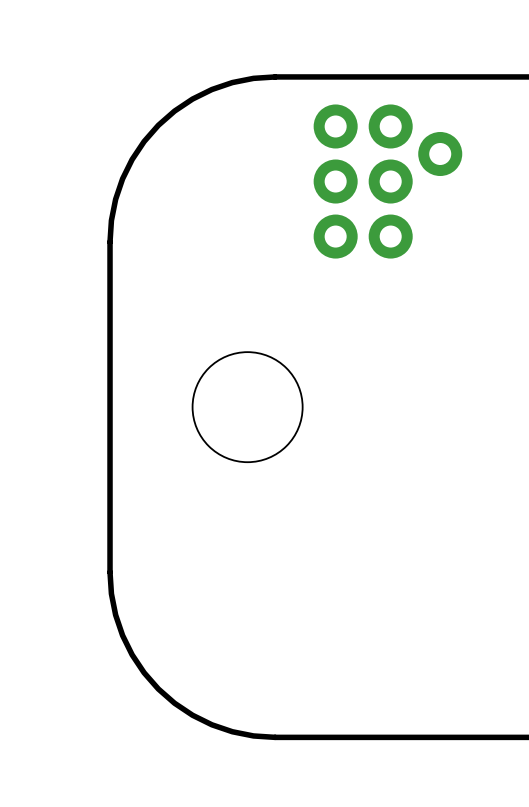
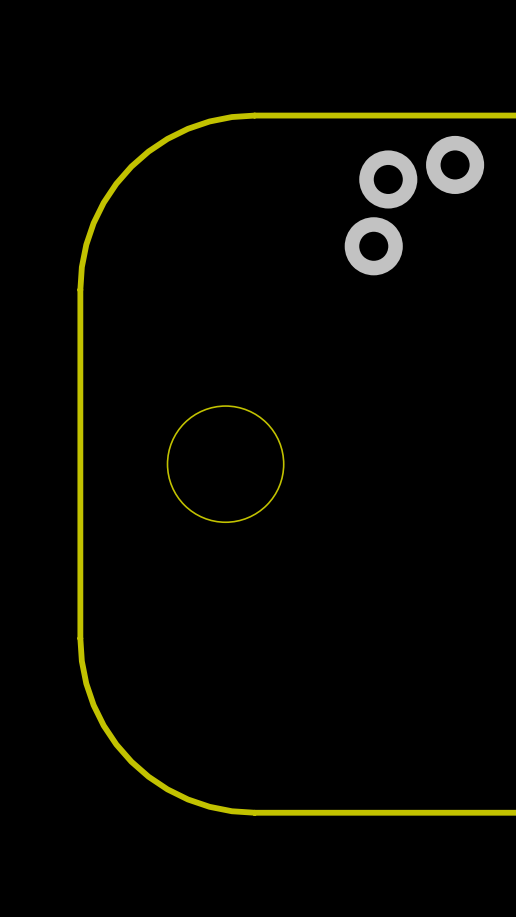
via size: [368, 104, 413, 149] -> [359, 150, 418, 209]
via: none -> (455, 164)
via: (335, 126) -> none
via: (440, 154) -> none
via: (335, 181) -> none
via: (390, 181) -> none
via: none -> (373, 246)
via: (335, 236) -> none
via: (390, 236) -> none

